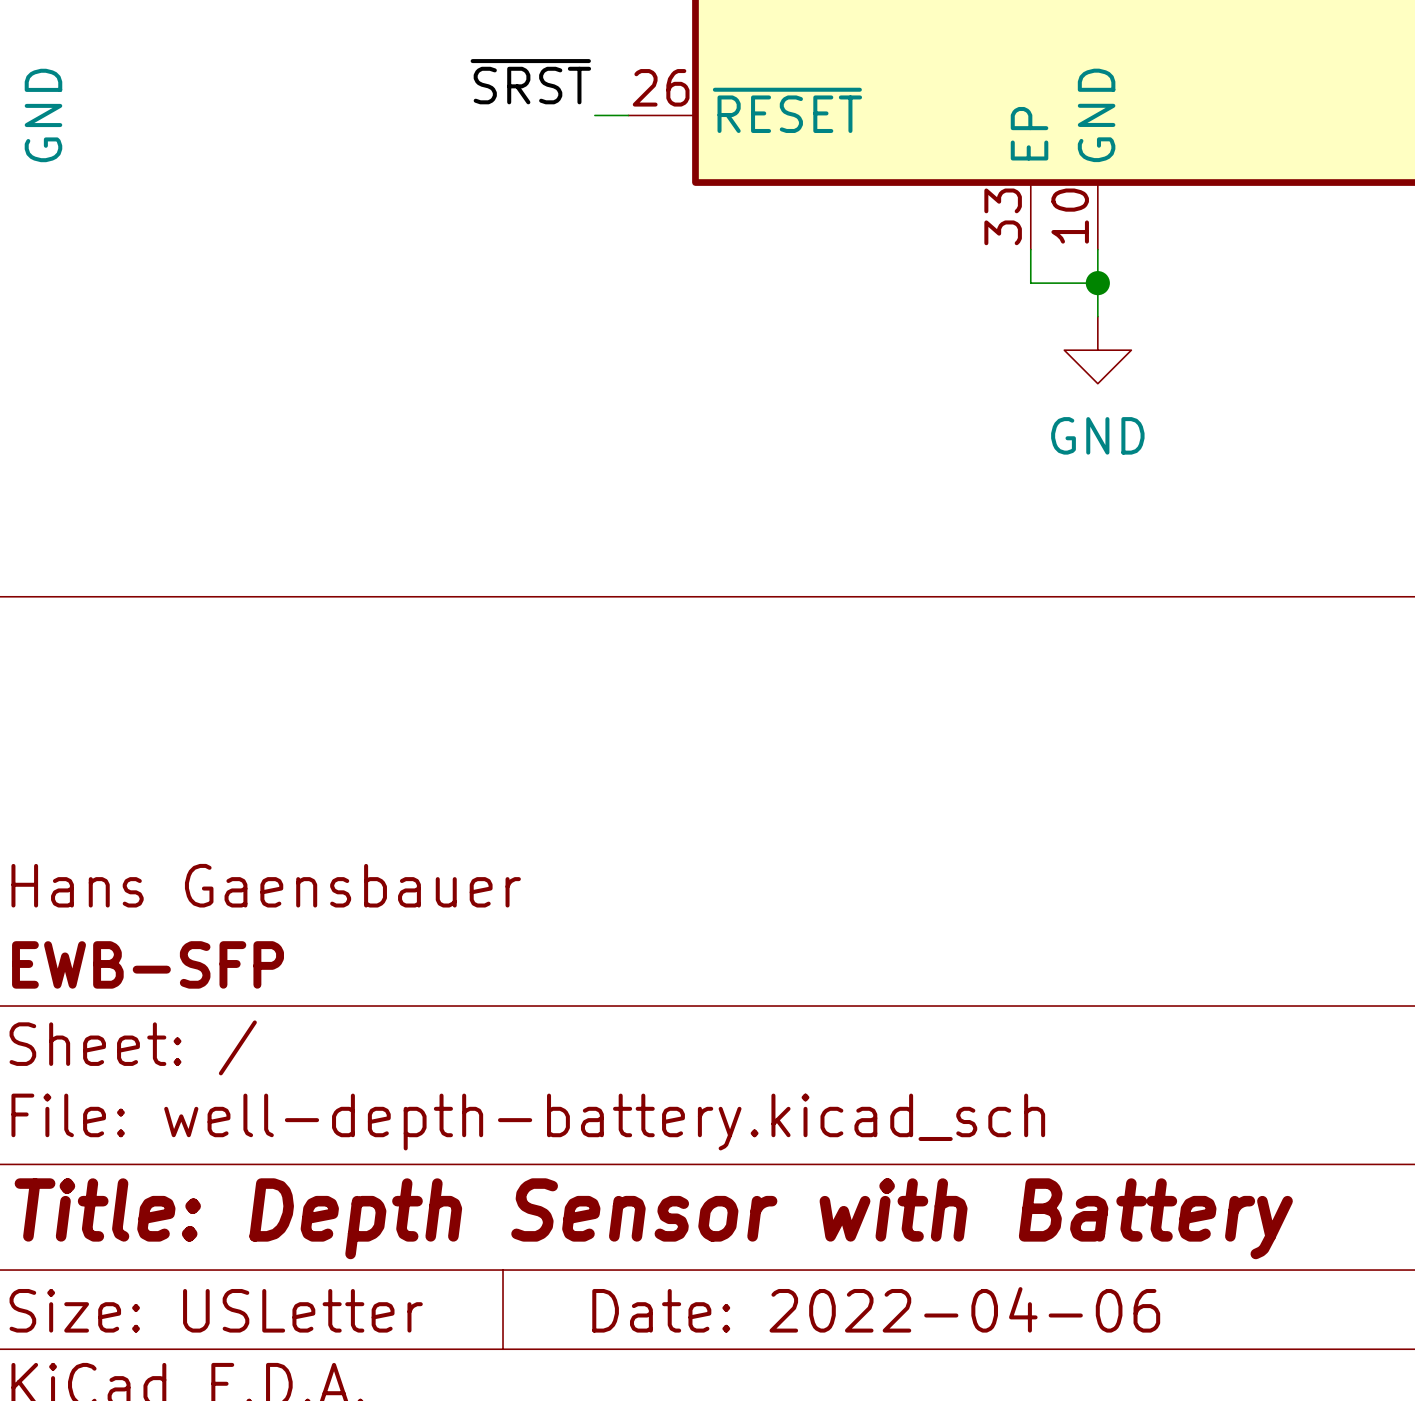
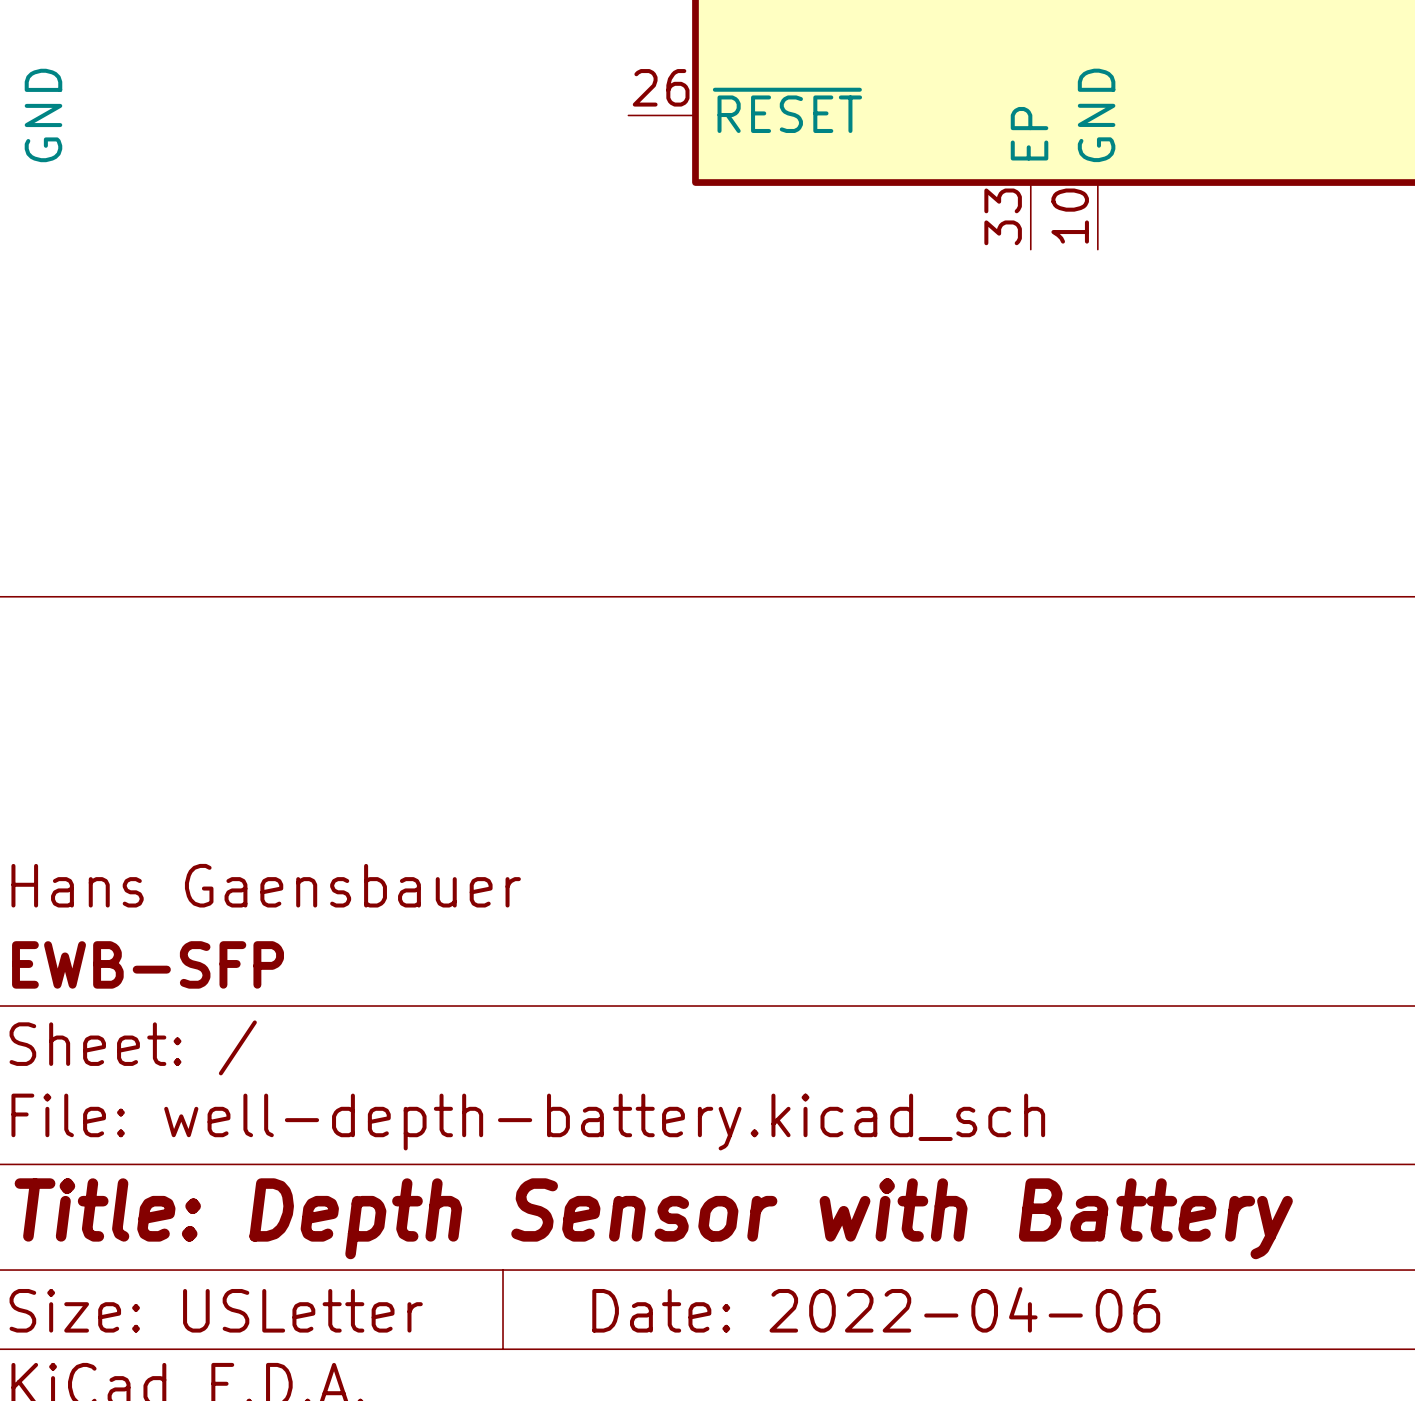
label: ~{SRST} (530, 81) -> none
wire: (594, 115) (628, 115) -> none
wire: (1030, 249) (1030, 283) (1097, 283) -> none
wire: (1097, 249) (1097, 316) -> none
junction: (1097, 283) -> none
power symbol: GND (1097, 350) -> none

